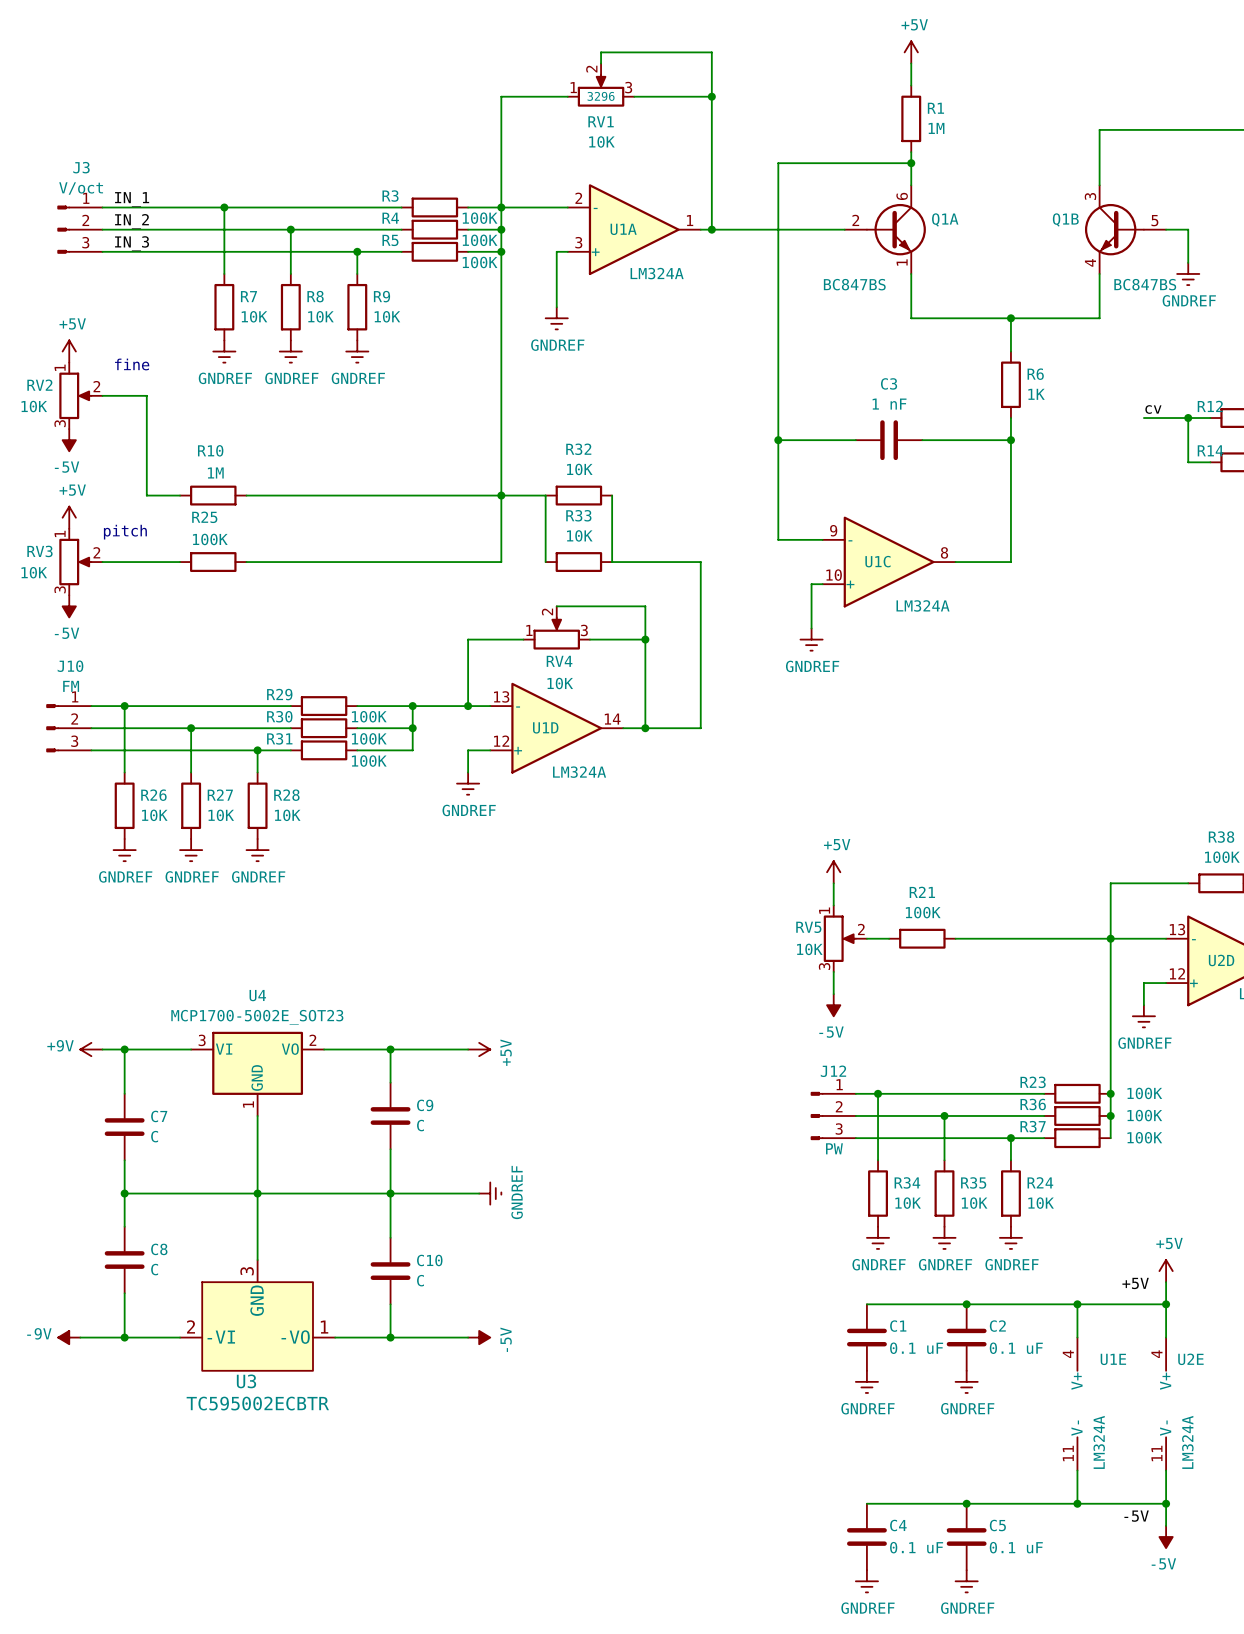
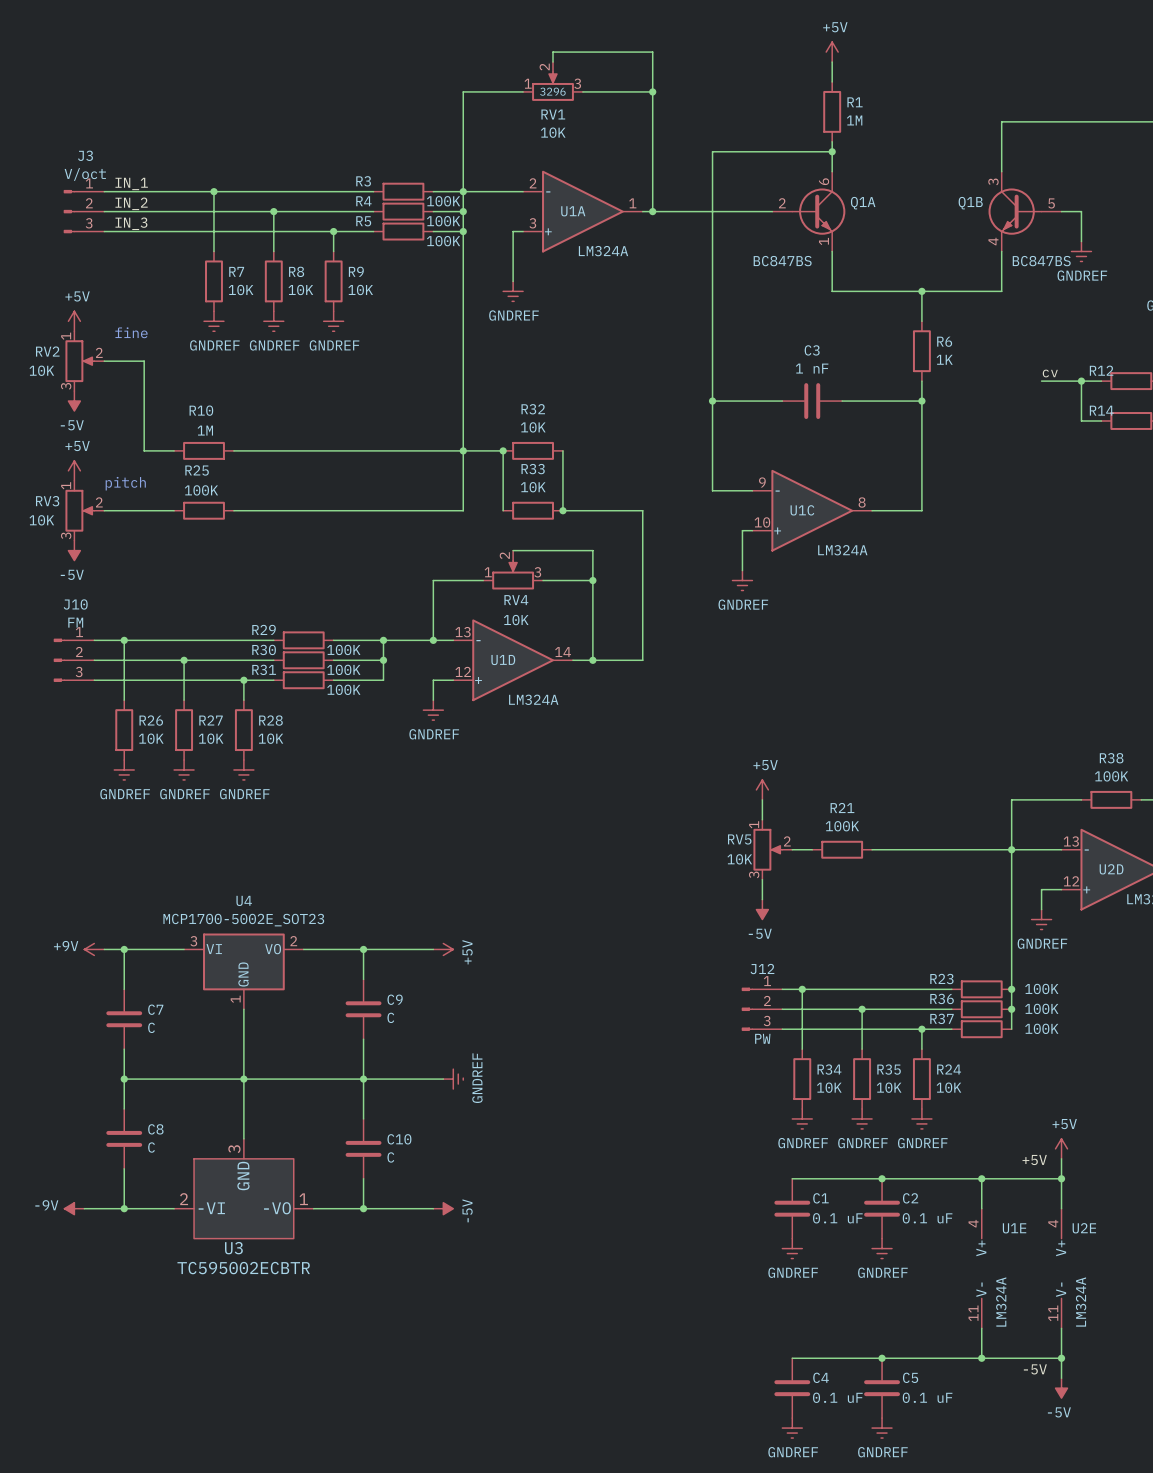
junction: none -> (503, 450)
junction: none -> (562, 510)

